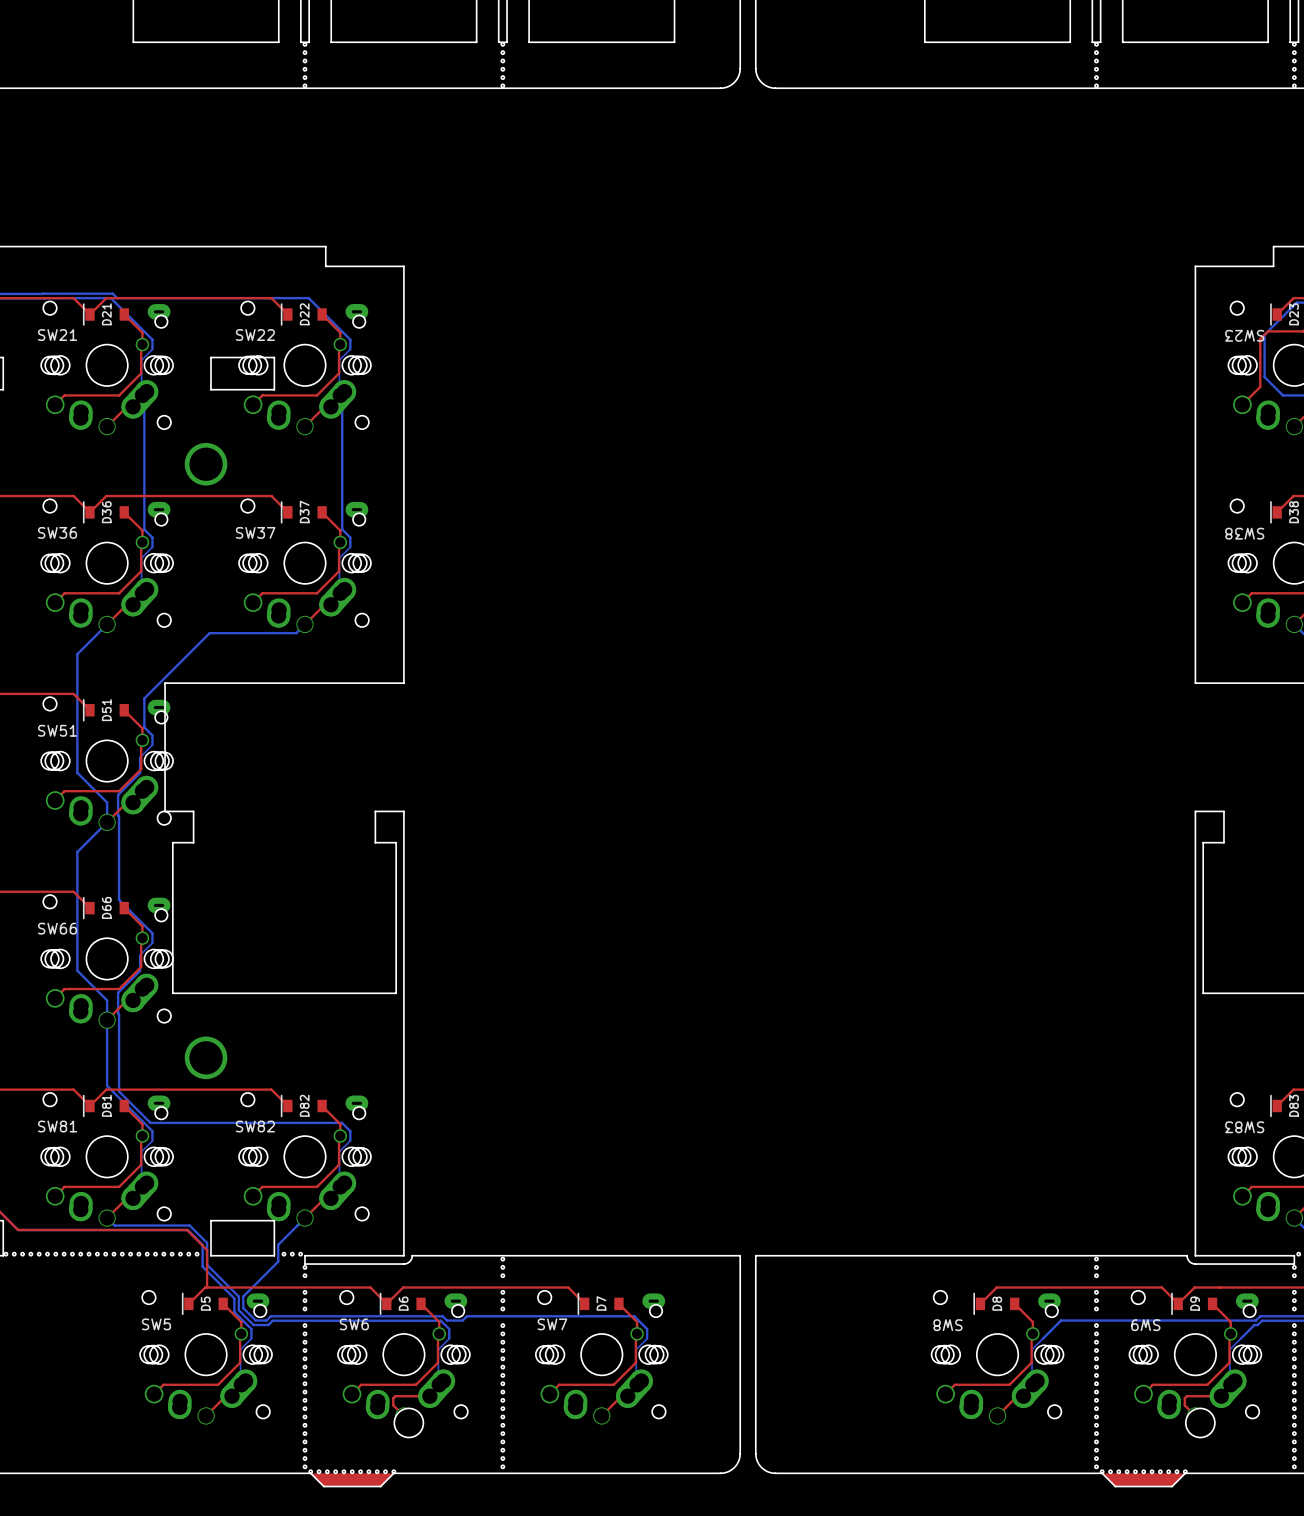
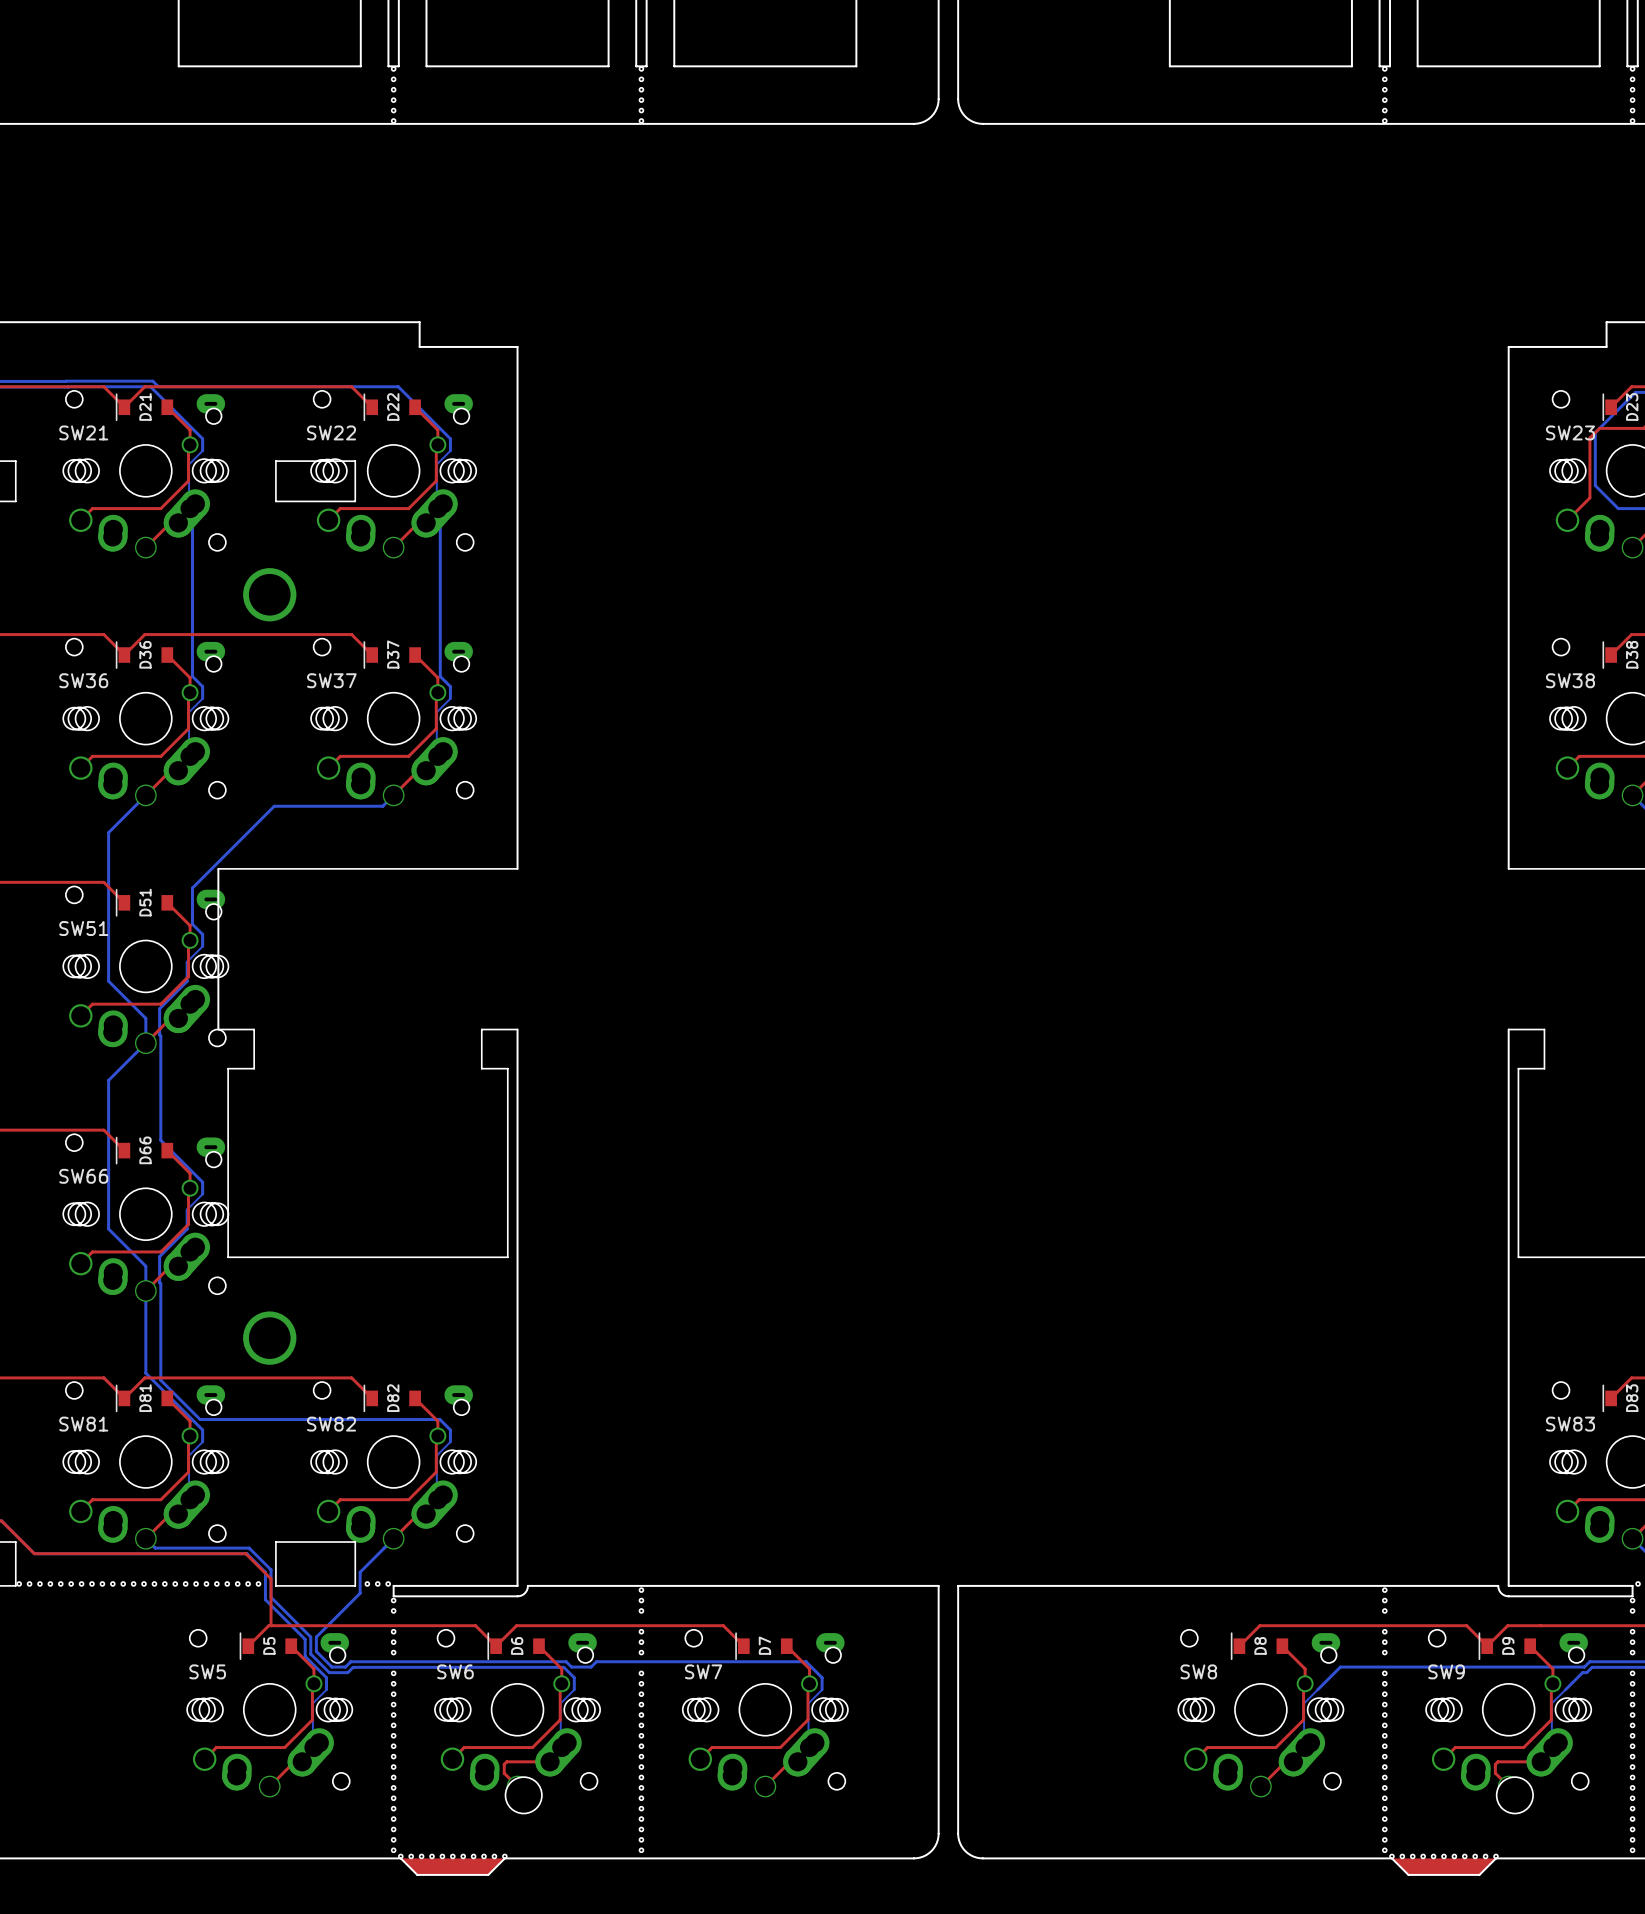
SW23 name rotation: 0° (1244, 335) -> 180° (1570, 432)
SW38 name rotation: 0° (1244, 533) -> 180° (1570, 680)
SW83 name rotation: 0° (1244, 1127) -> 180° (1570, 1424)
SW8 name rotation: 0° (947, 1325) -> 180° (1198, 1671)
SW9 name rotation: 0° (1145, 1325) -> 180° (1446, 1671)

